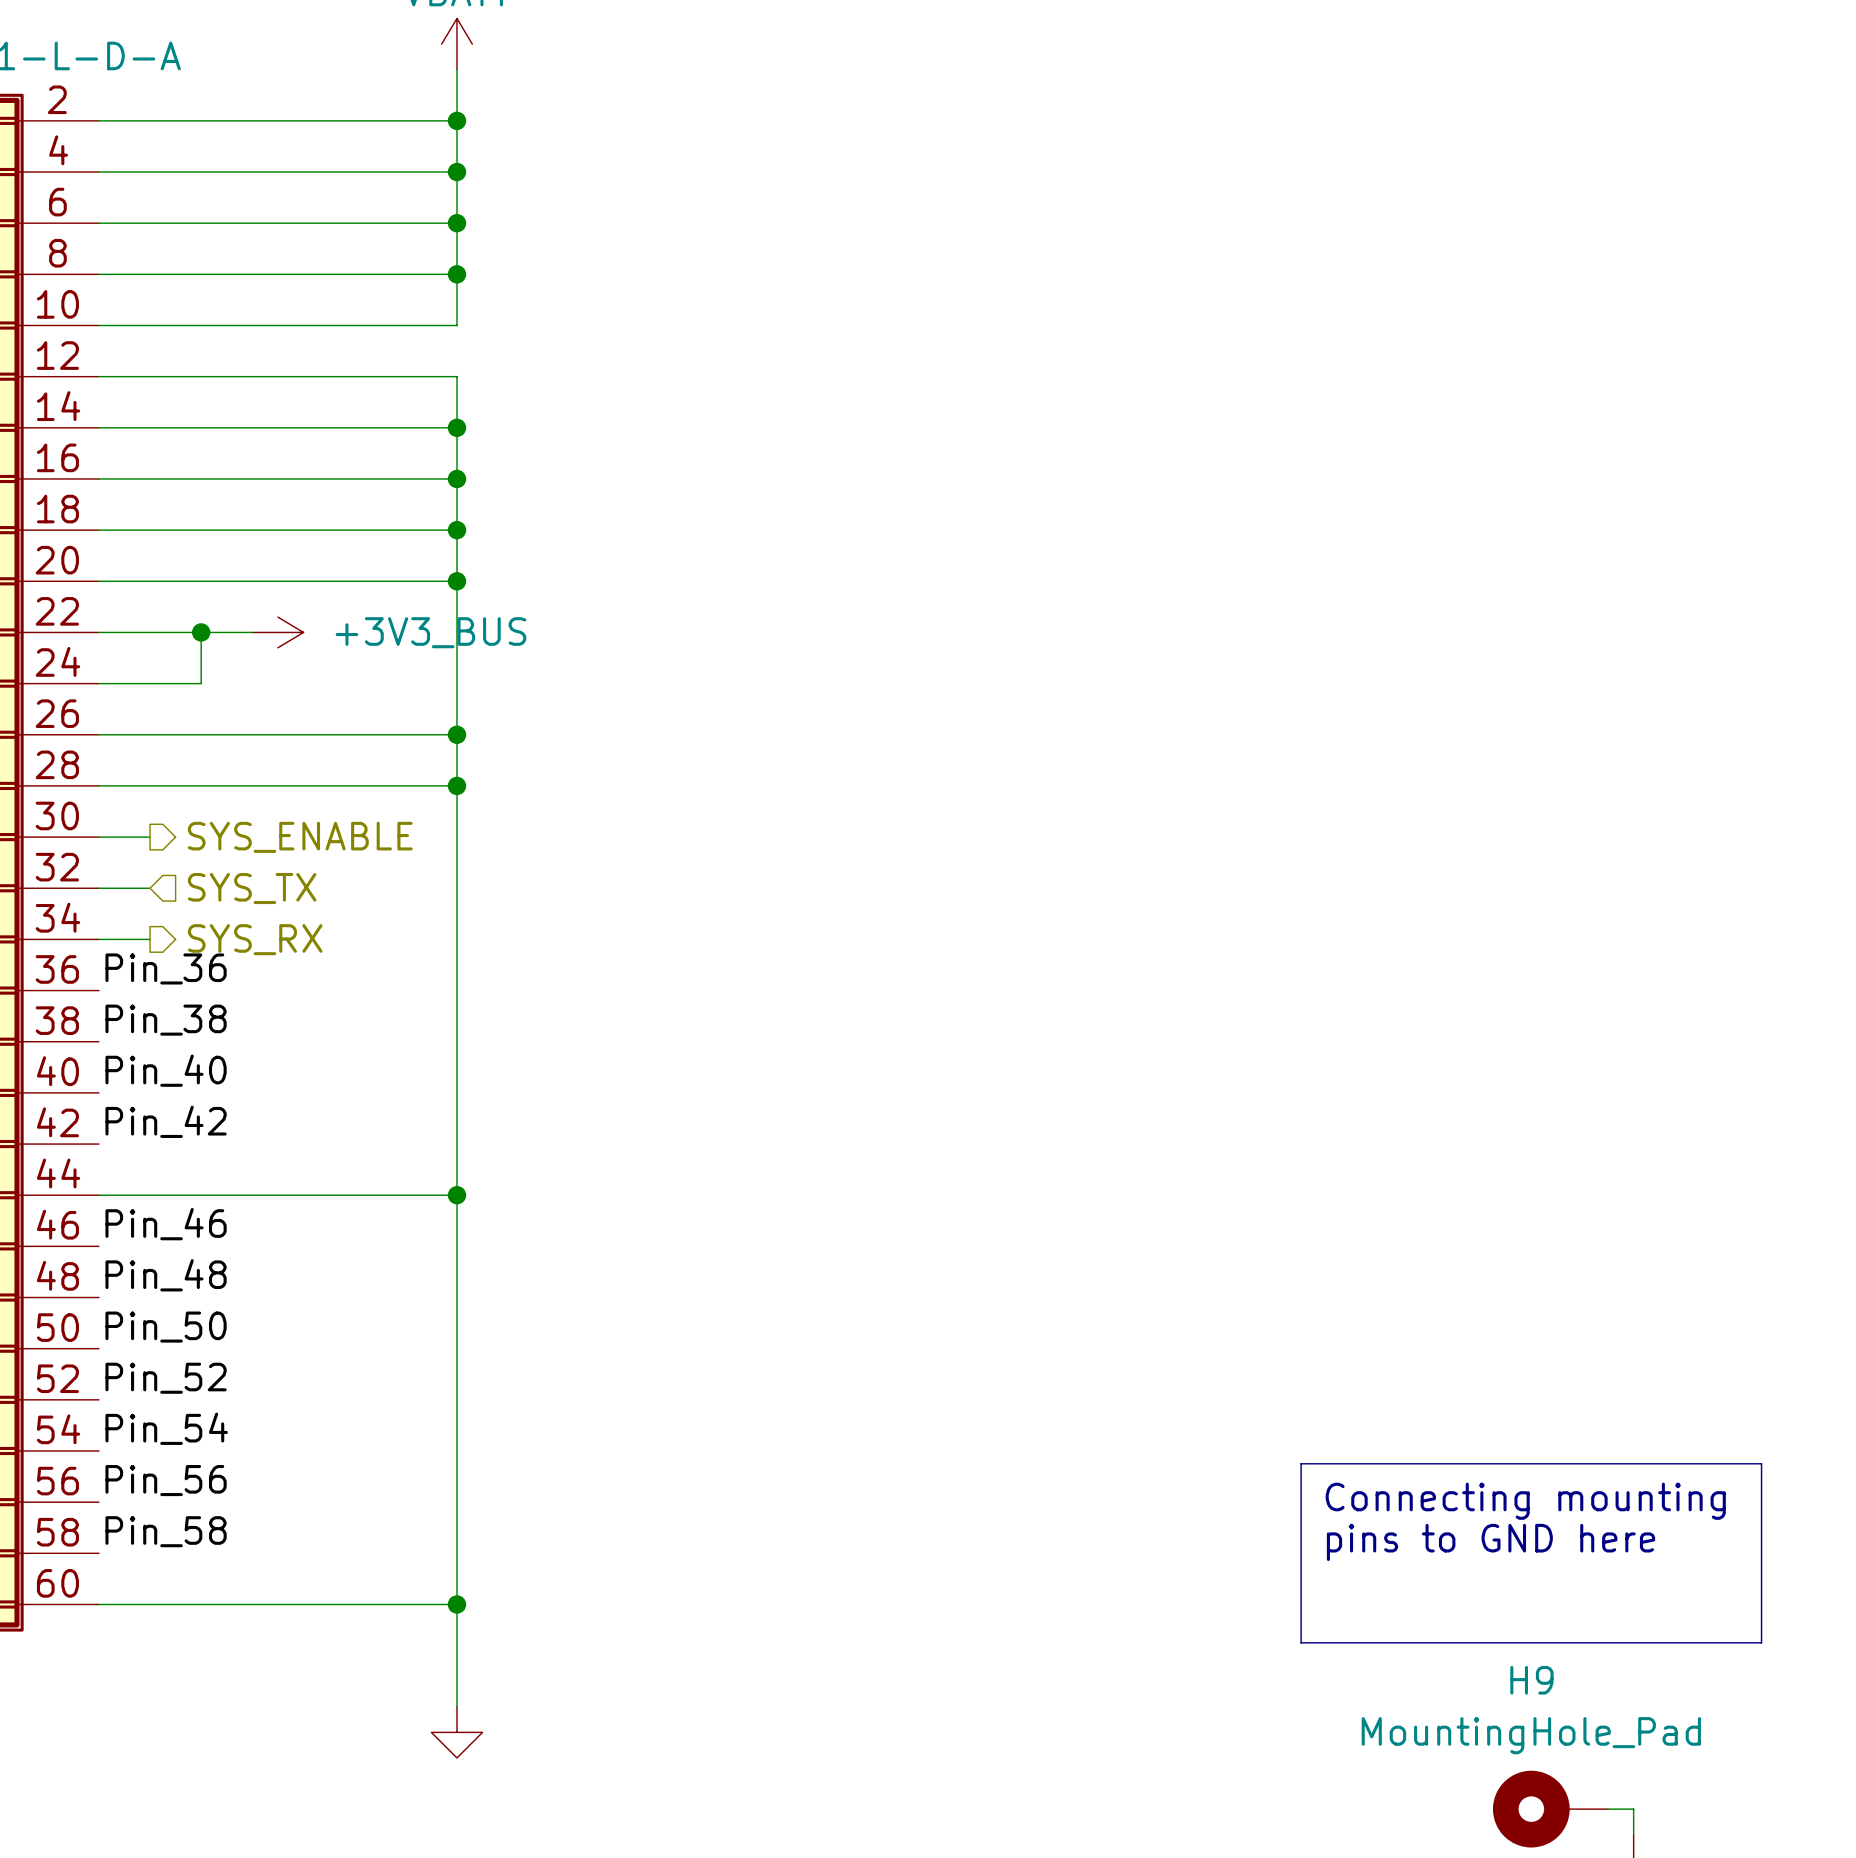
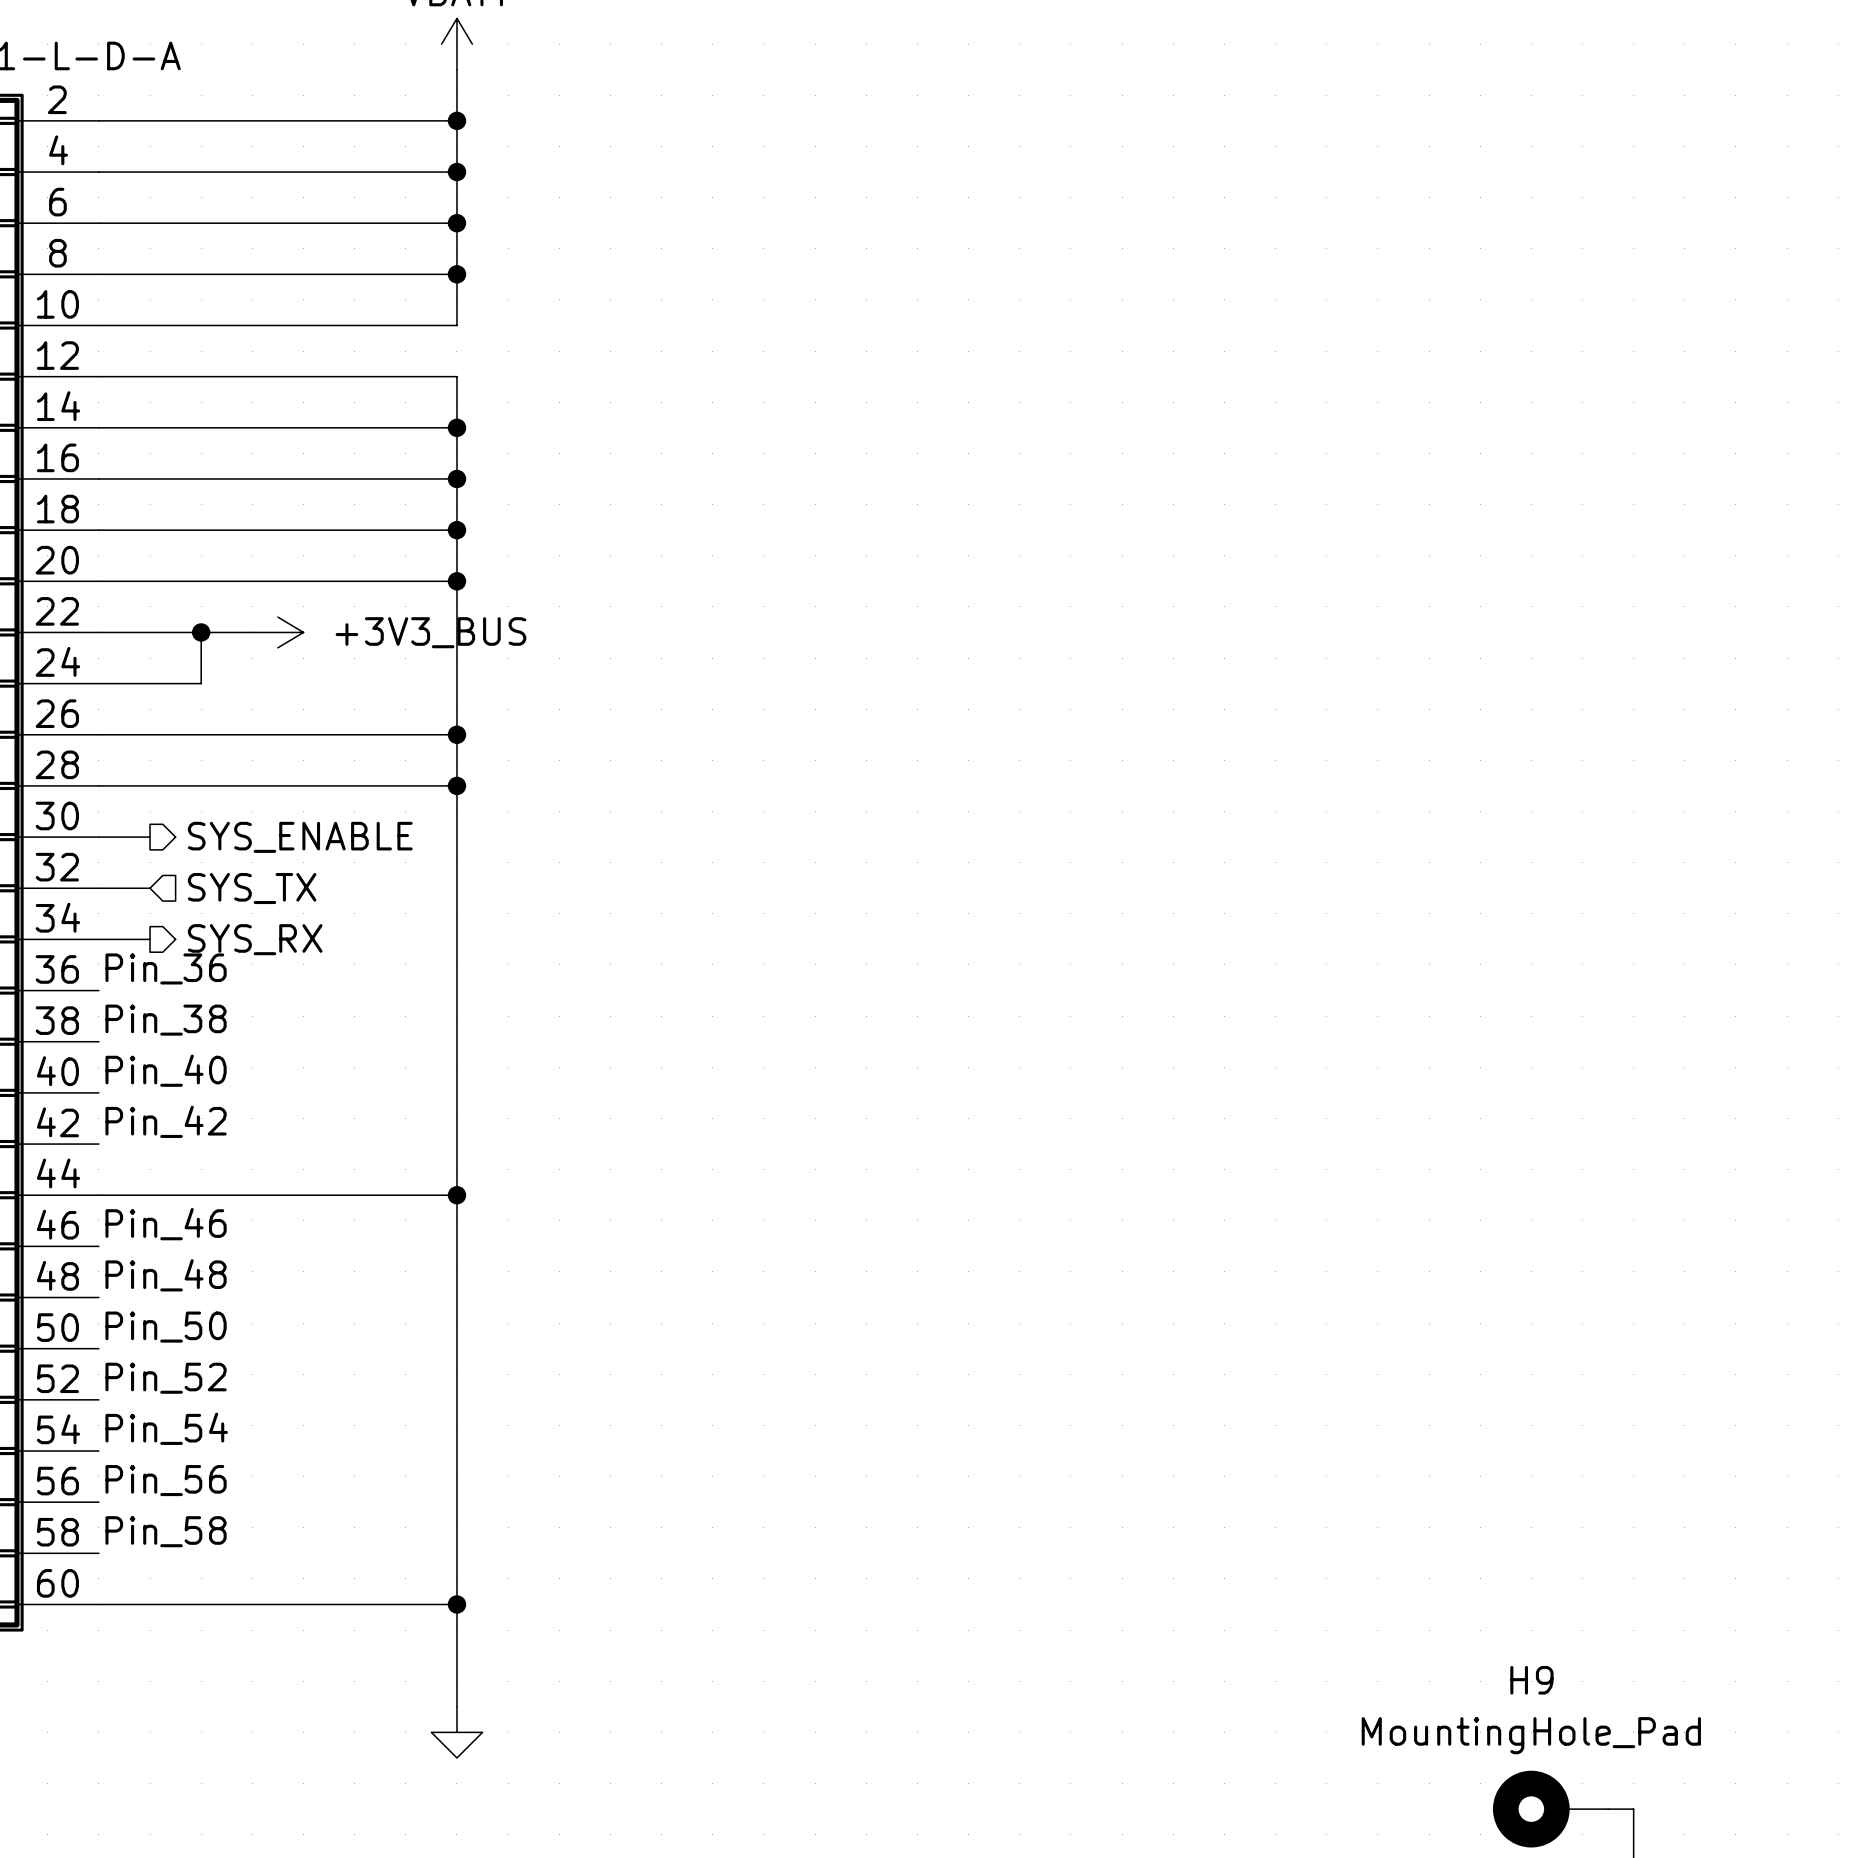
line: (1301, 1463) (1761, 1463) (1761, 1642) (1301, 1642) (1301, 1463) -> none
text: Connecting mounting (1525, 1501) -> none
text: pins to GND here (1491, 1542) -> none

